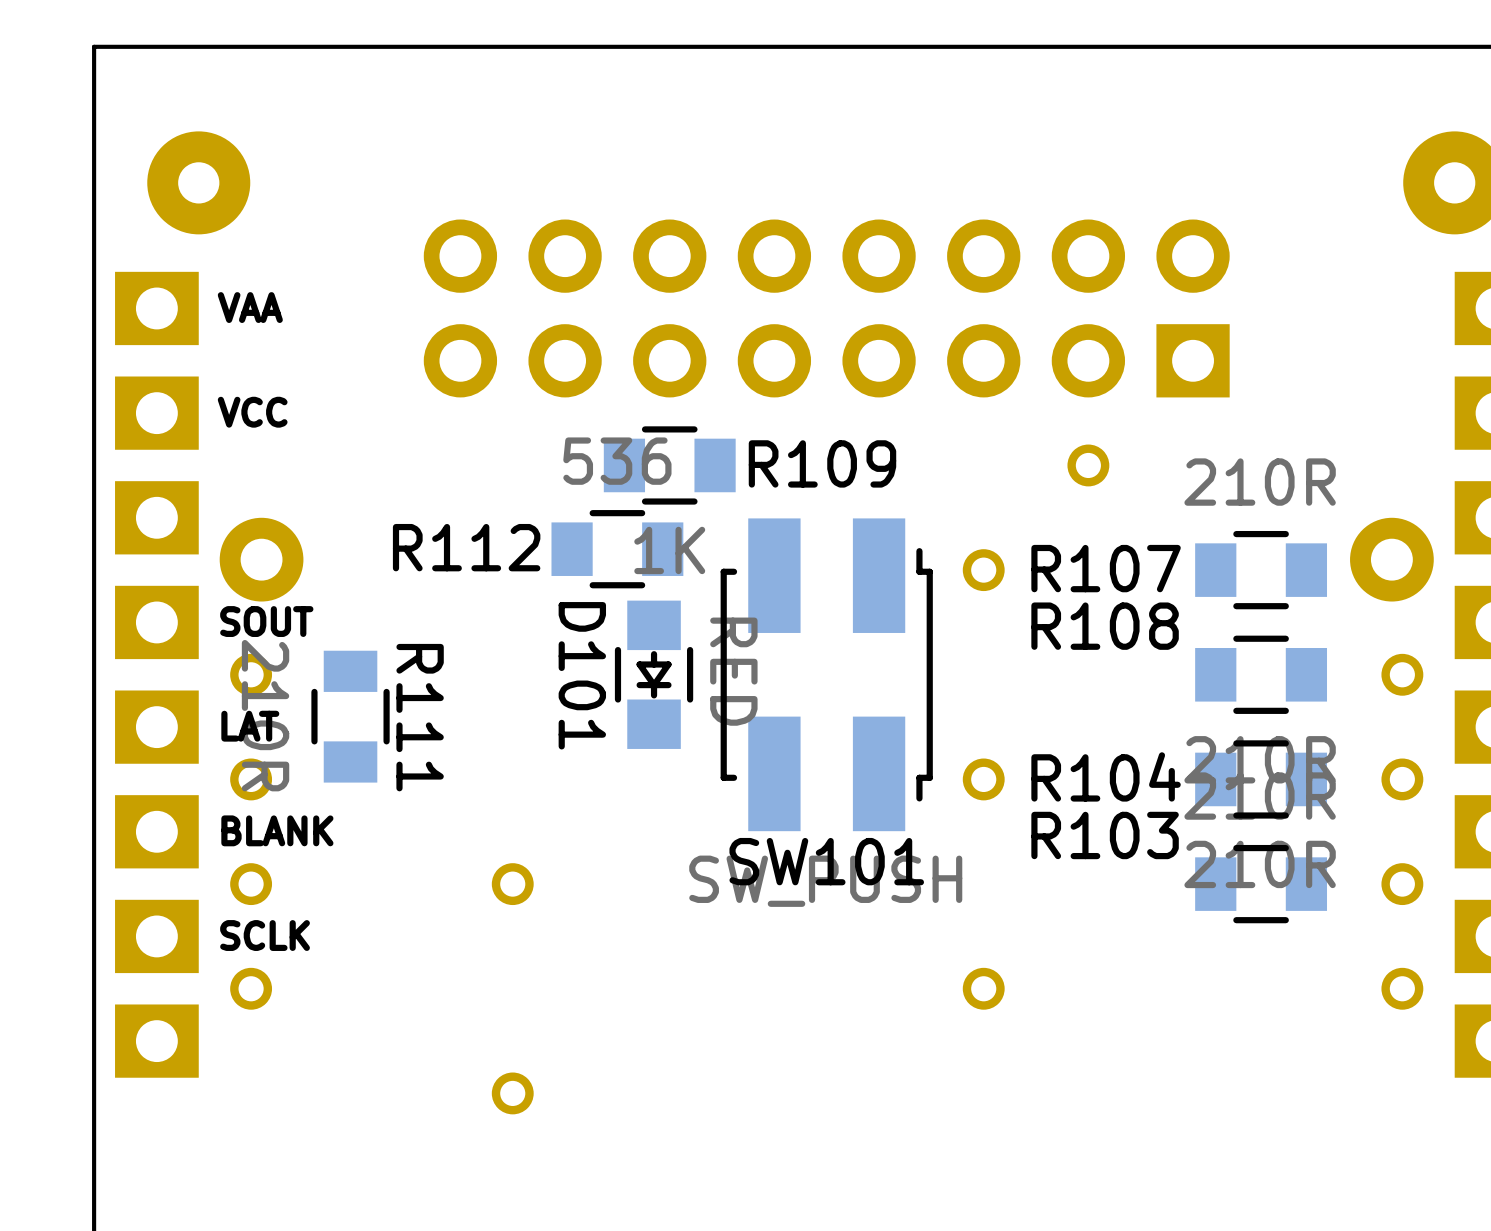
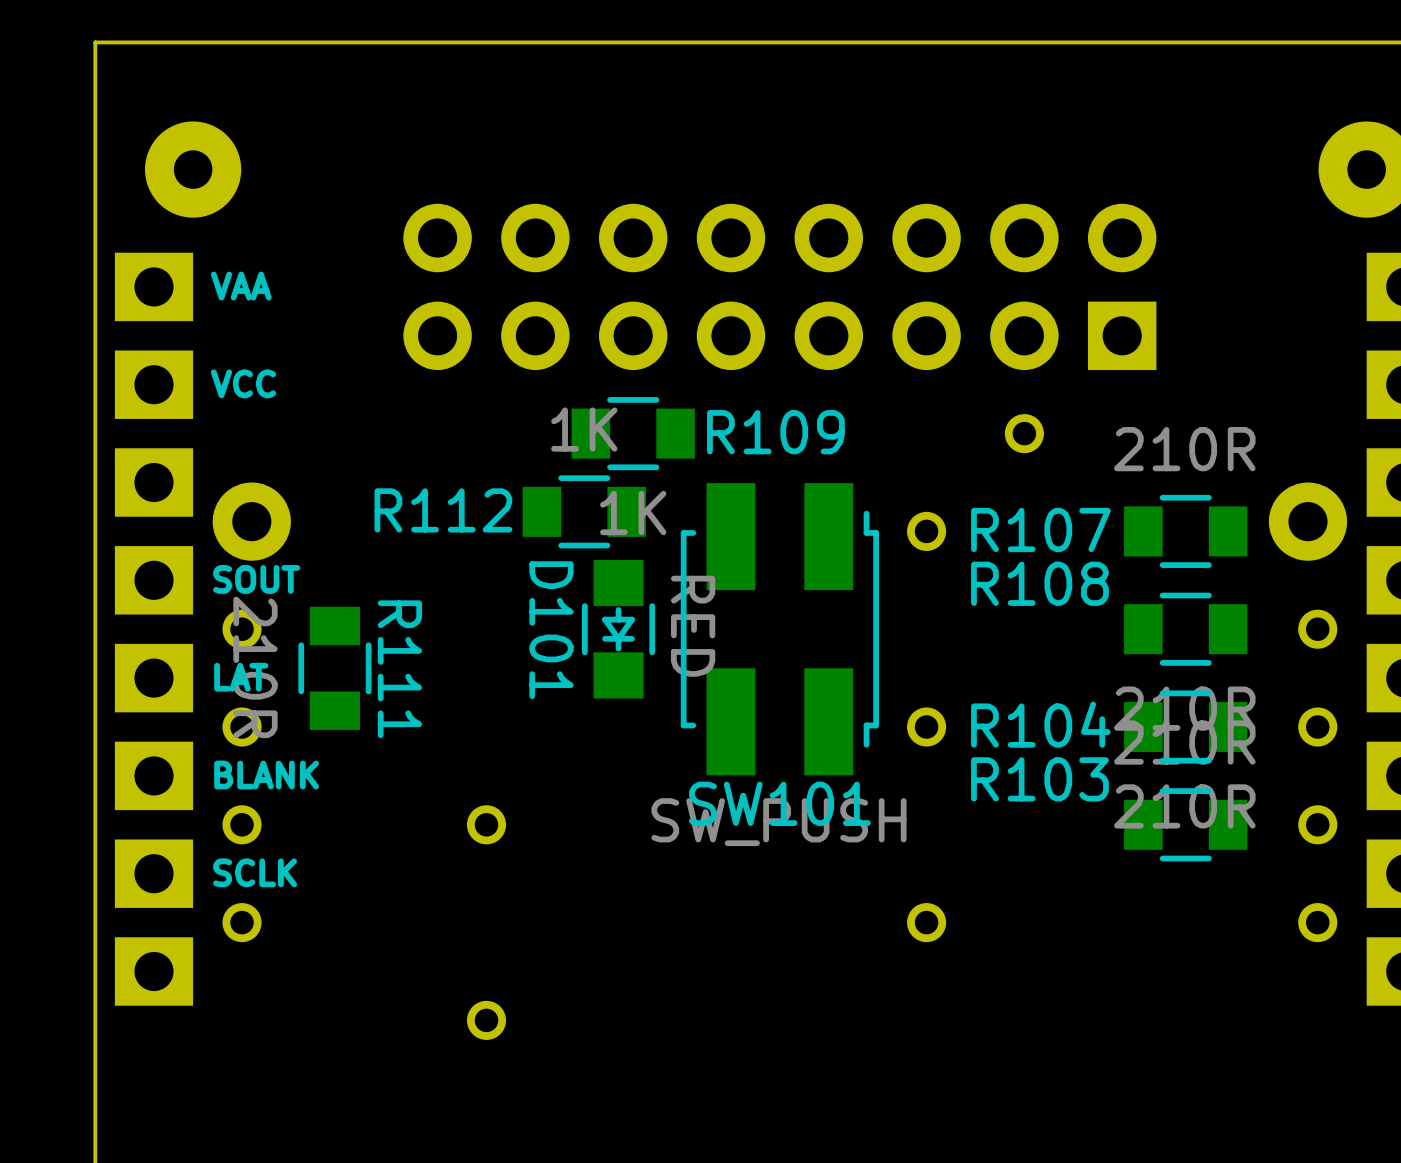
R112 value: 536 (617, 461) -> 1K (584, 429)

